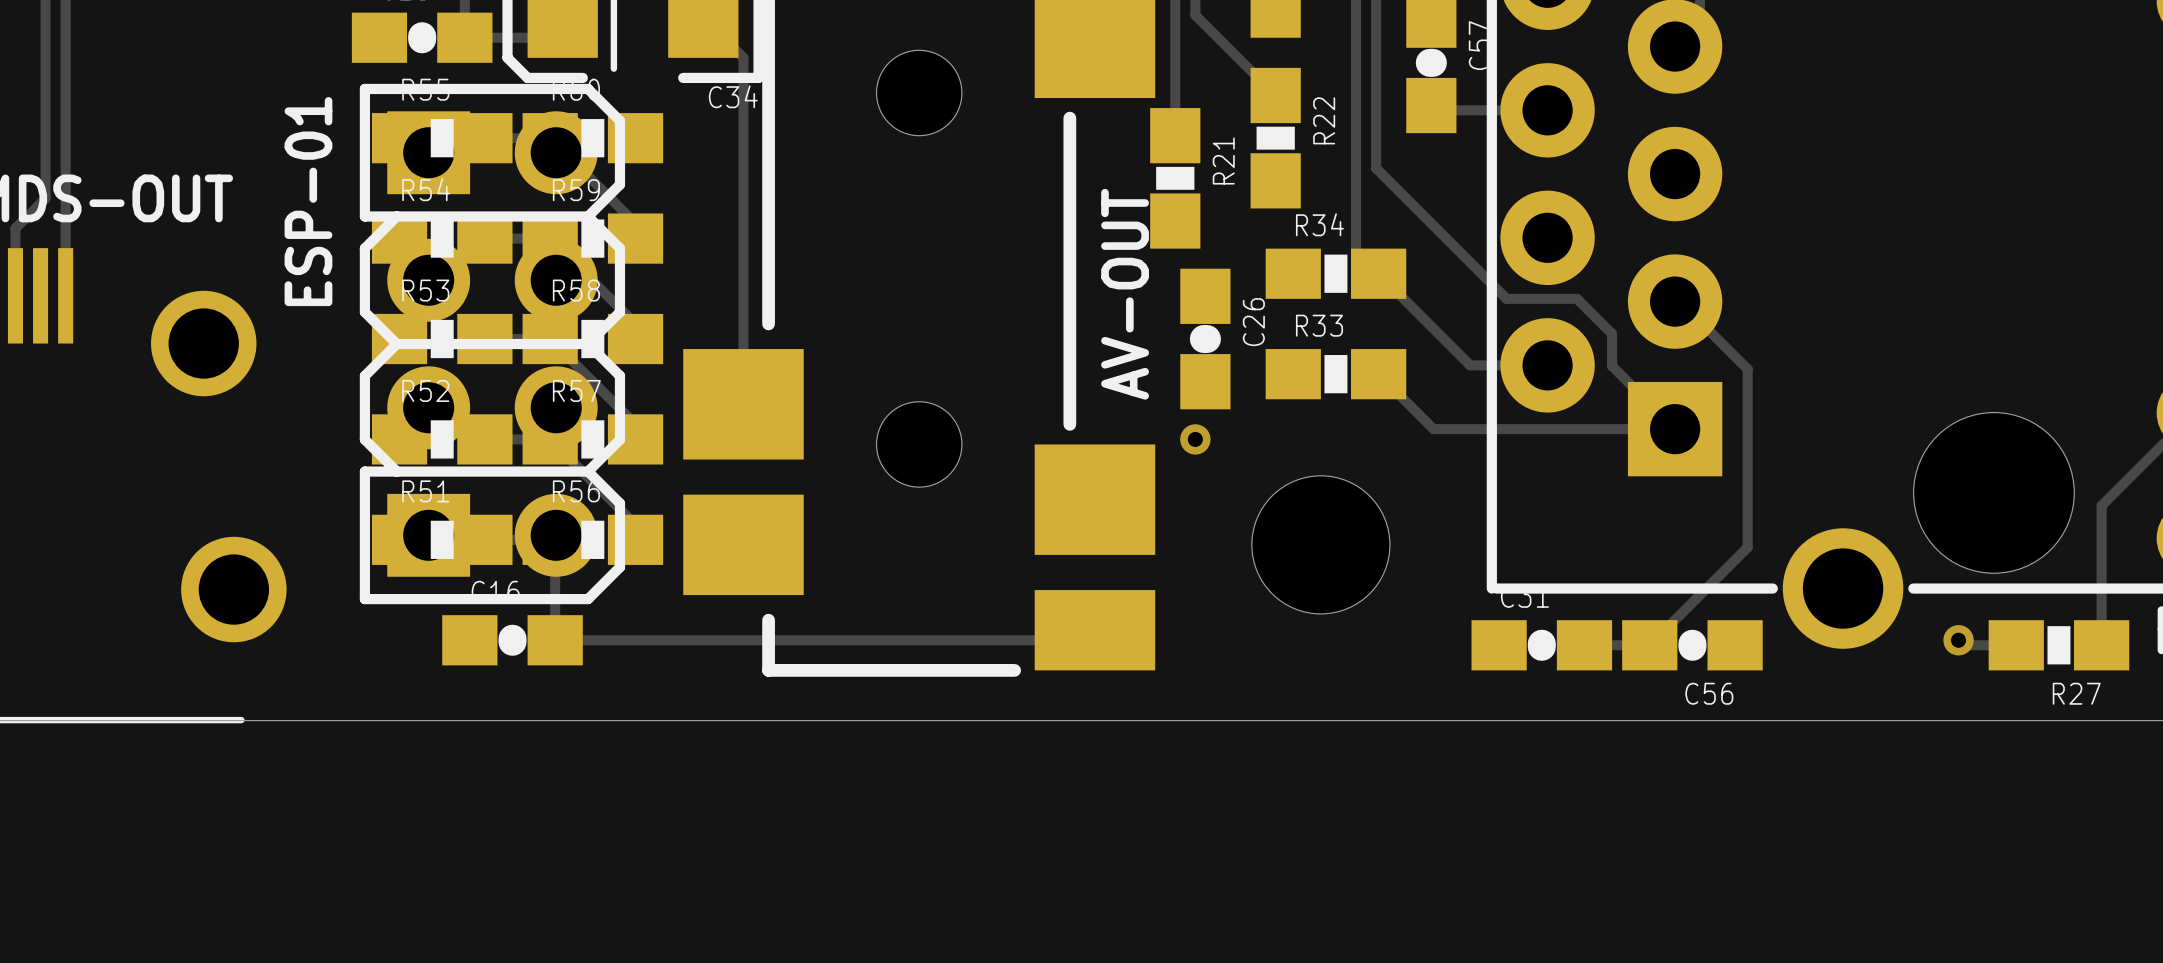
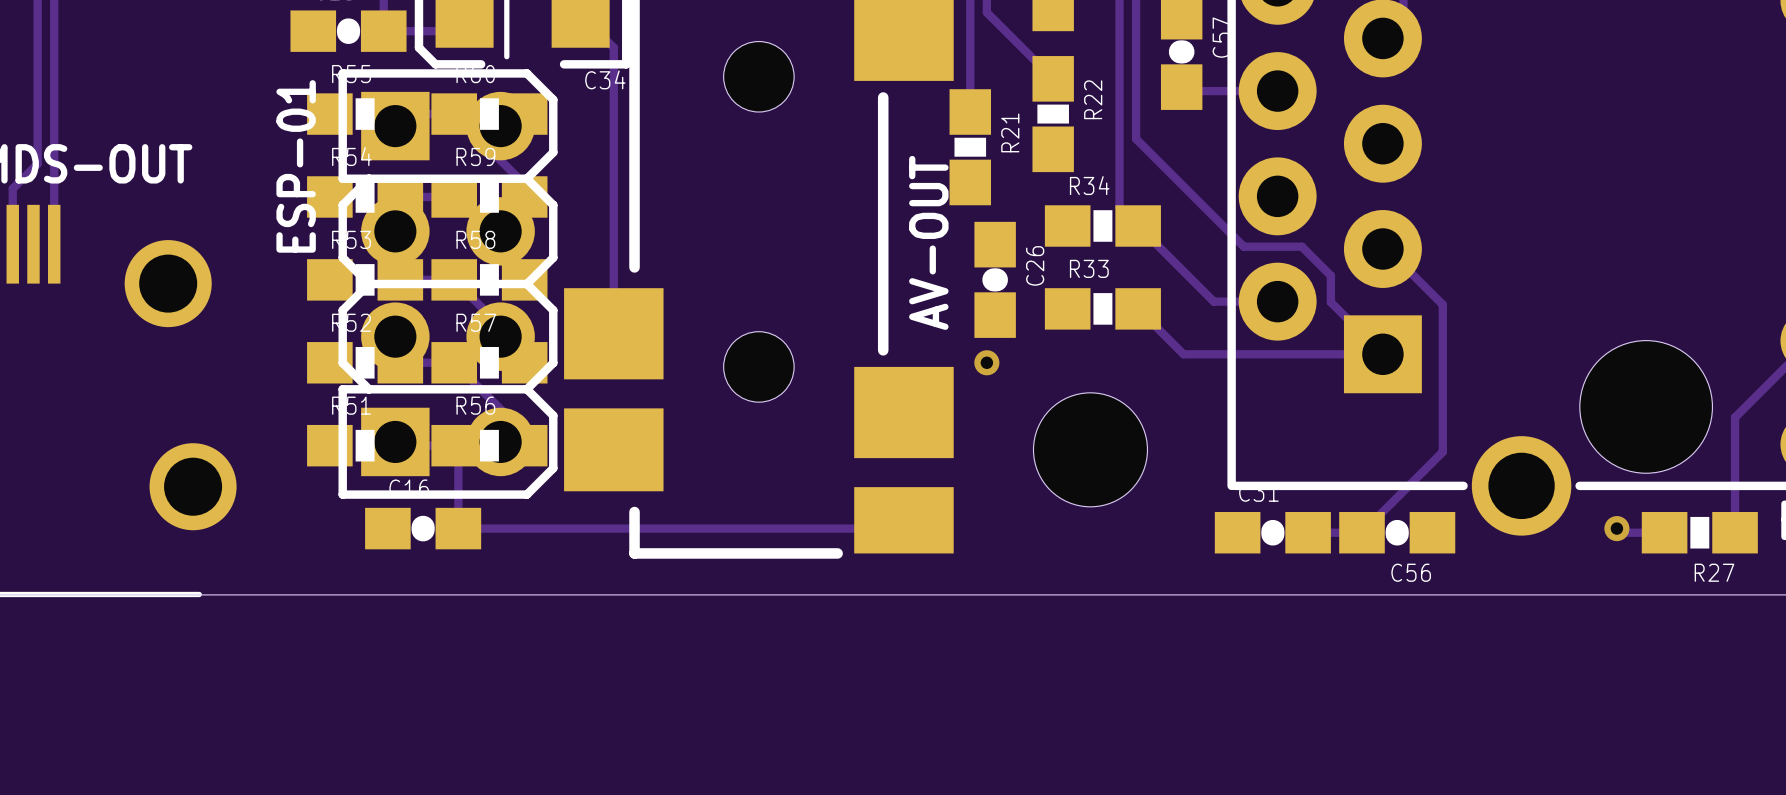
ESP-01 position: (492, 344) -> (447, 284)

